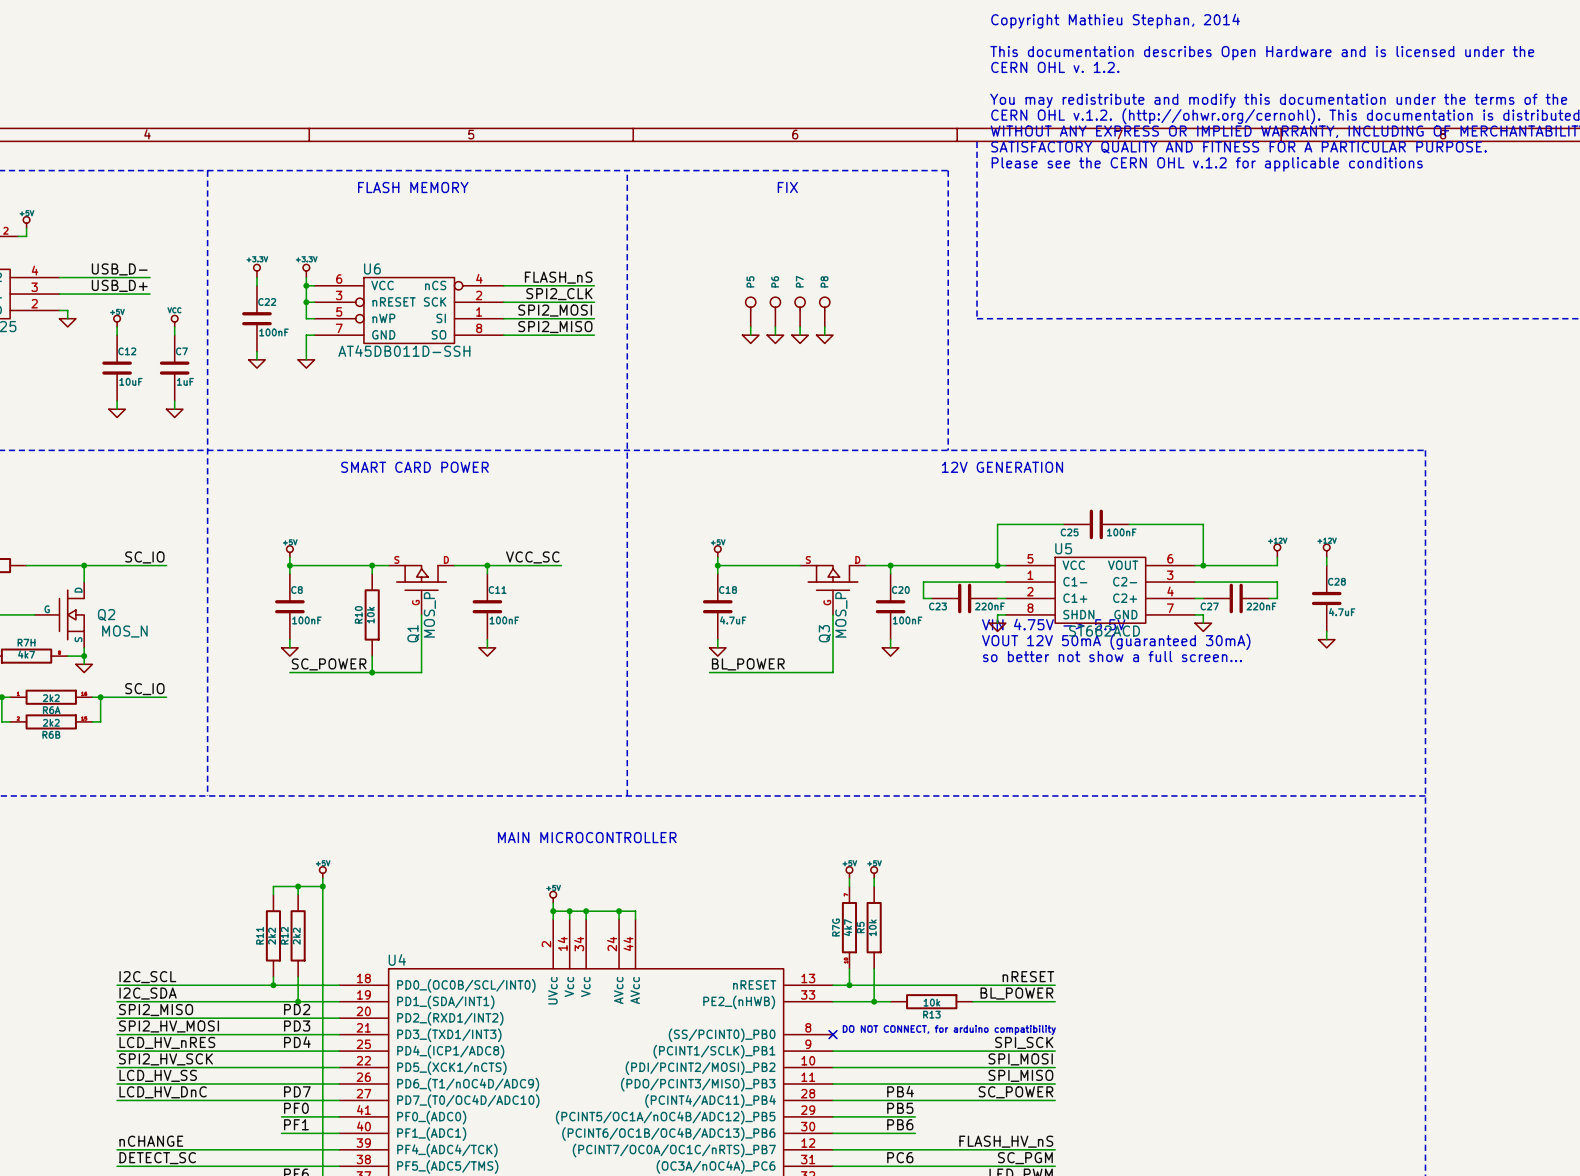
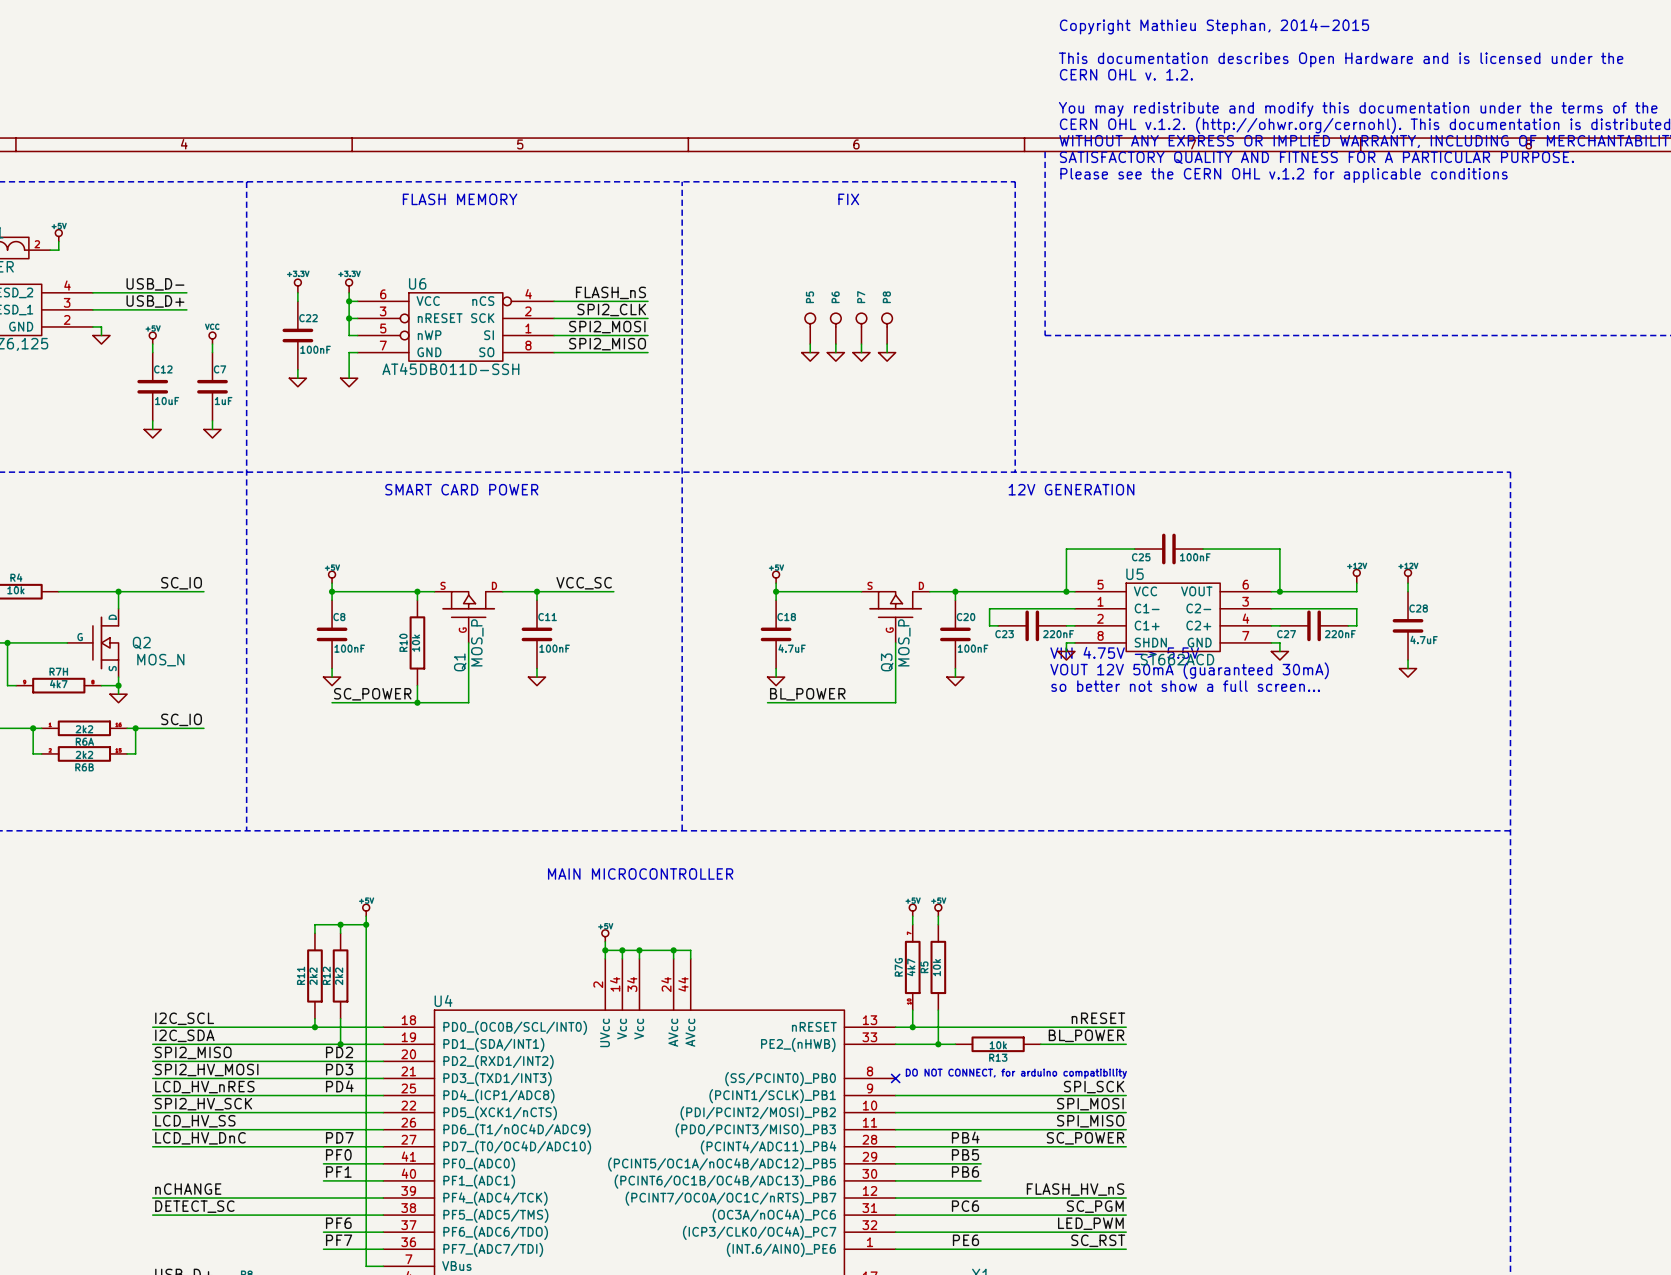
text: Copyright Mathieu Stephan, 2014 (1115, 21) -> Copyright Mathieu Stephan, 2014-2015 (1214, 26)

